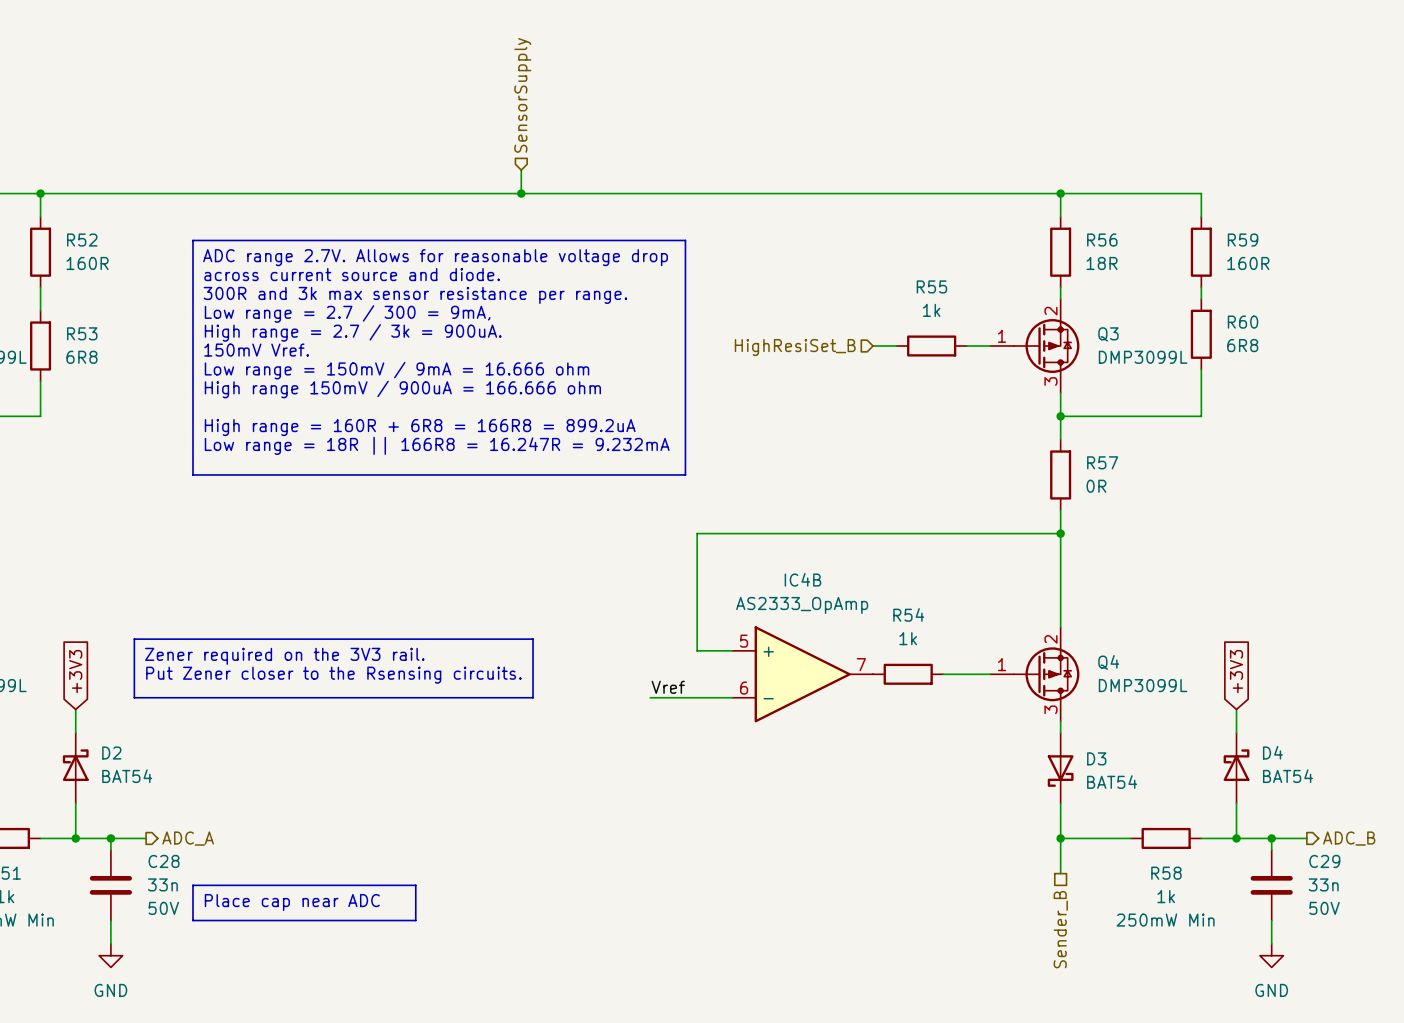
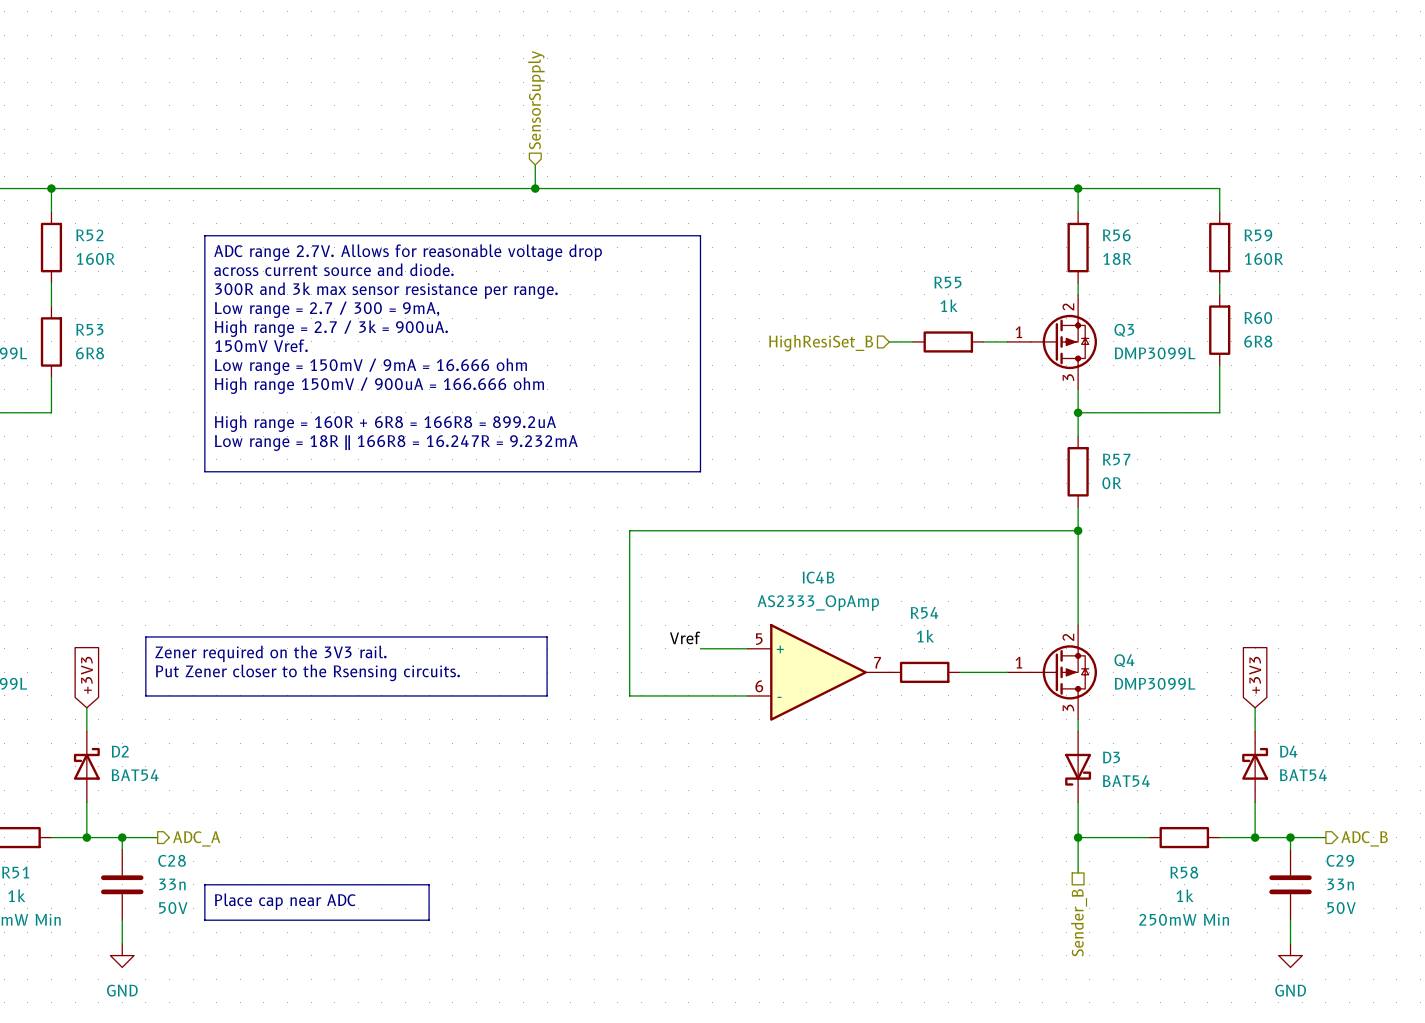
wire: (697, 533) (697, 650) -> (712, 530) (629, 530) (629, 695) (665, 695)
wire: none -> (700, 648) (712, 648)
label position: Vref (668, 687) -> Vref (685, 637)

